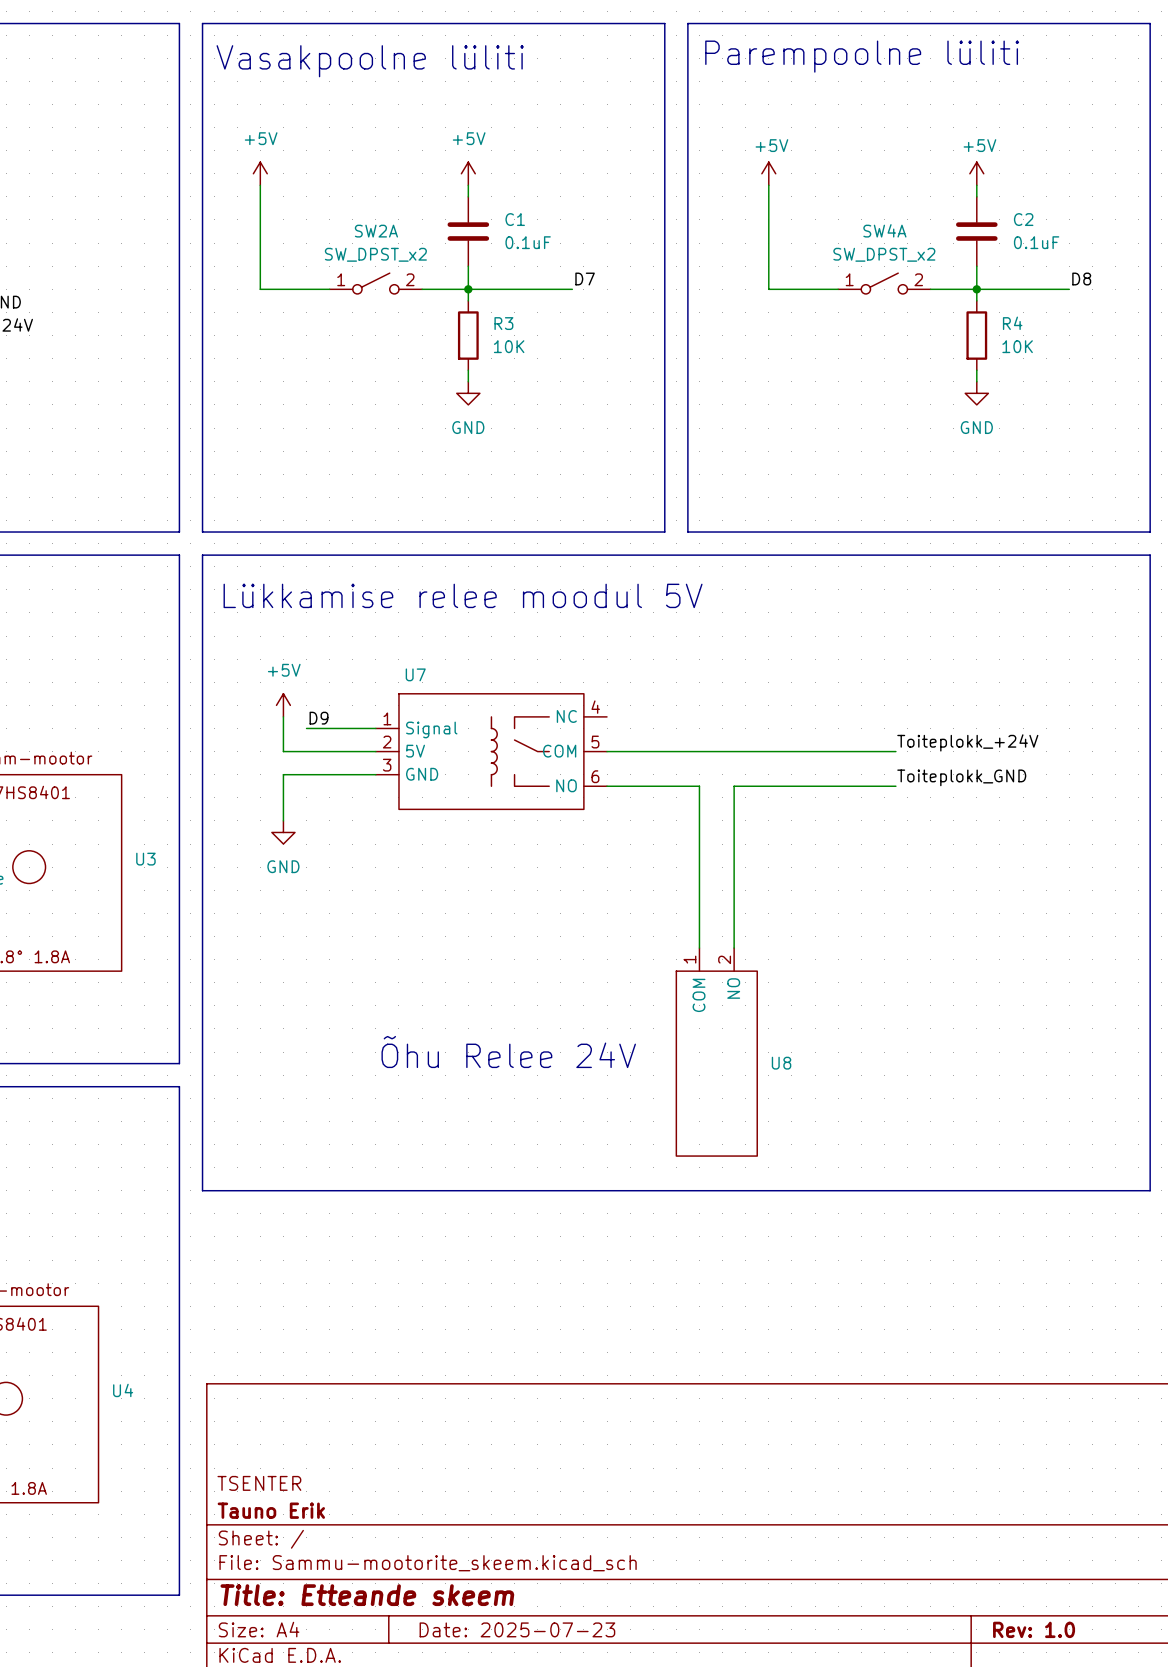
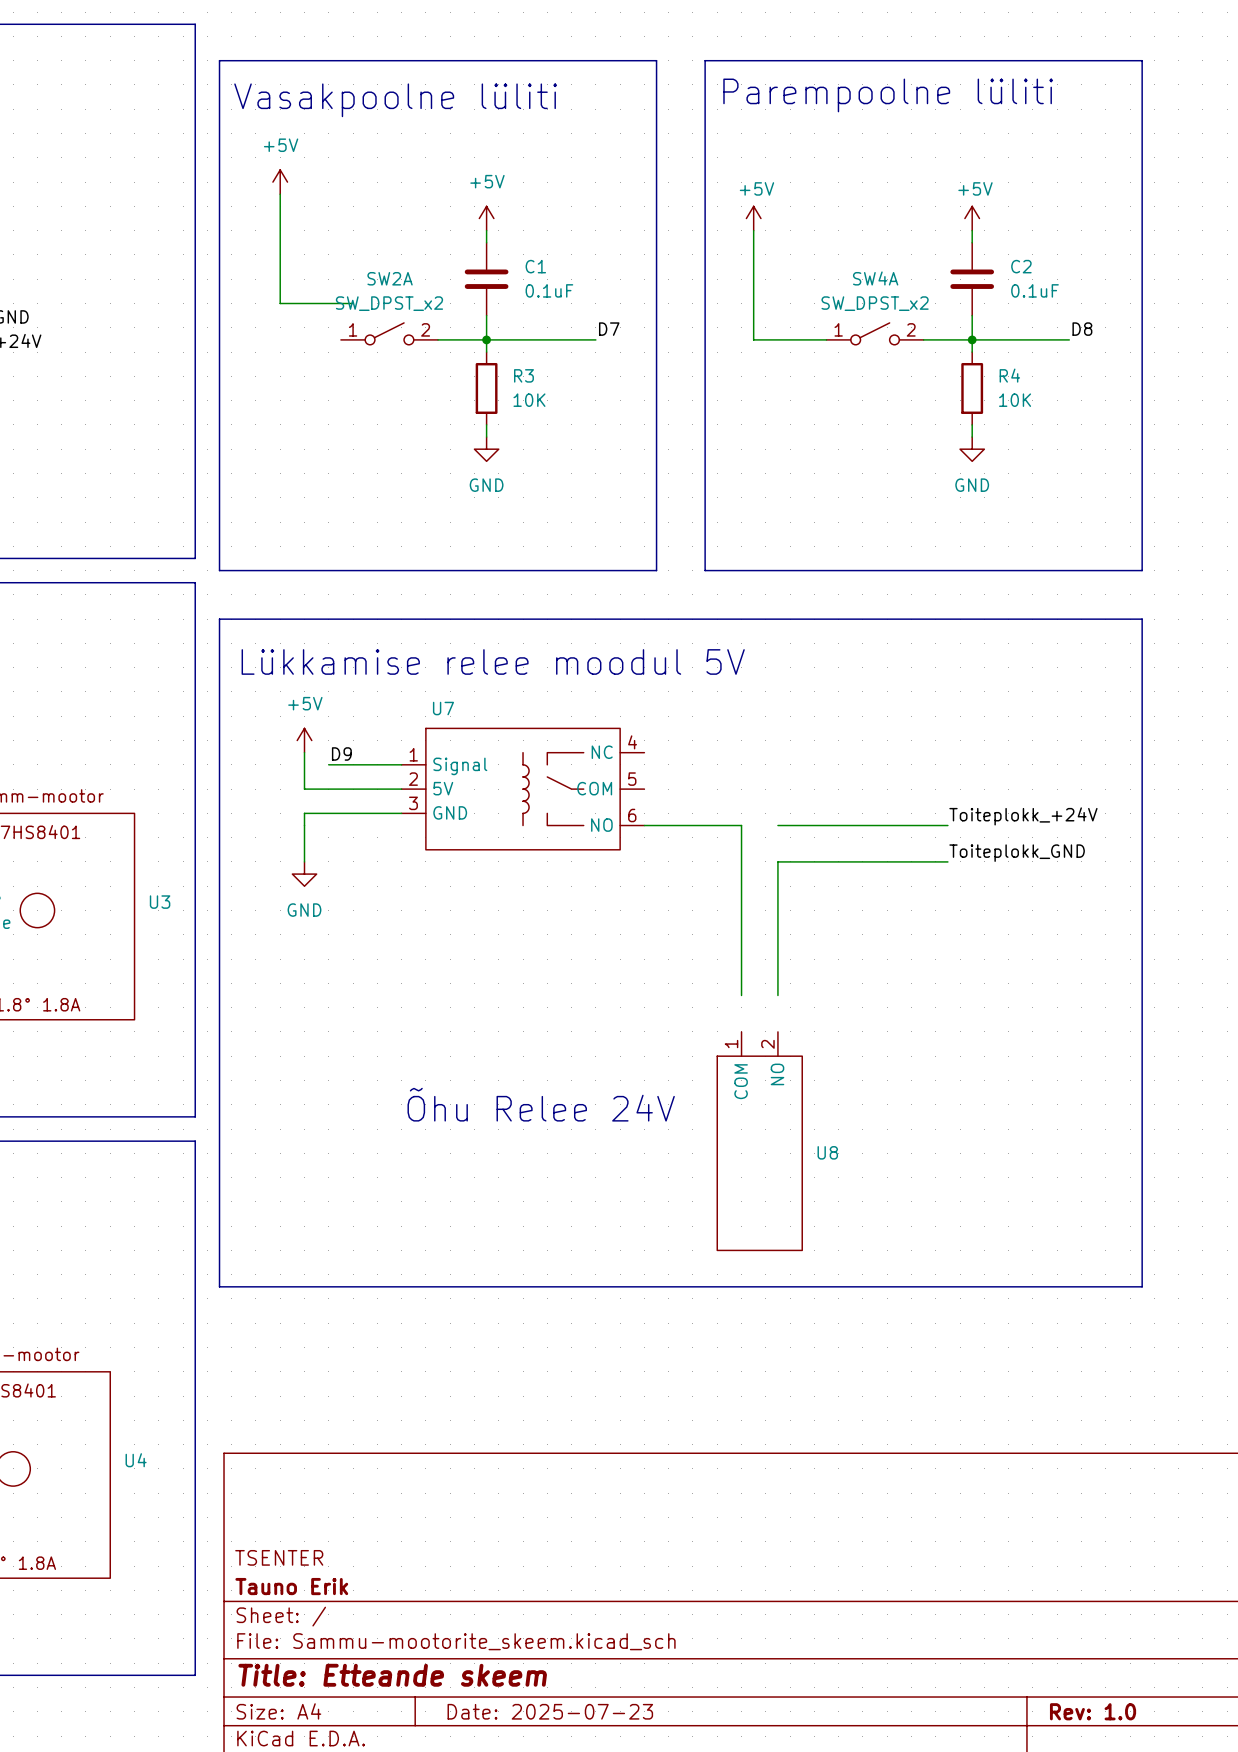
line: (687, 23) (1150, 23) (1150, 532) (687, 532) (687, 23) -> none
text position: Parempoolne lüliti (862, 56) -> Parempoolne lüliti (888, 95)
line: (202, 58) (202, 23) (664, 23) (664, 58) -> (219, 60) (656, 60) (656, 570) (219, 570) (219, 558)
text position: Vasakpoolne lüliti (370, 61) -> Vasakpoolne lüliti (395, 100)
power symbol position: +5V (468, 173) -> +5V (486, 218)
power symbol position: +5V (768, 173) -> +5V (753, 218)
power symbol position: +5V (976, 173) -> +5V (972, 218)
wire: (468, 185) (468, 196) -> (486, 230) (486, 242)
wire: (768, 185) (768, 289) (838, 289) -> (753, 230) (753, 339) (826, 339)
wire: (976, 185) (976, 196) -> (972, 230) (972, 242)
C1 position: (468, 231) -> (486, 279)
C2 position: (976, 231) -> (972, 279)
wire: (468, 266) (468, 300) -> (486, 315) (486, 352)
wire: (976, 266) (976, 300) -> (972, 315) (972, 352)
label position: D7 (585, 279) -> D7 (609, 329)
label position: D8 (1081, 279) -> D8 (1082, 329)
SW2A position: (375, 283) -> (389, 333)
SW4A position: (884, 283) -> (875, 333)
wire: (422, 289) (572, 289) -> (438, 339) (595, 339)
junction position: (468, 289) -> (486, 339)
wire: (930, 289) (1069, 289) -> (923, 339) (1069, 339)
junction: (976, 289) -> none
junction: none -> (972, 339)
R3 position: (468, 335) -> (486, 388)
R4 position: (976, 335) -> (972, 388)
wire: (468, 370) (468, 381) -> (486, 424) (486, 437)
wire: (976, 370) (976, 381) -> (972, 424) (972, 437)
power symbol position: GND (468, 393) -> GND (486, 449)
power symbol position: GND (976, 393) -> GND (972, 449)
line: (202, 532) (664, 532) -> (705, 60) (1142, 60) (1142, 570) (705, 570) (705, 558)
line: (202, 589) (202, 555) (1150, 555) (1150, 1190) (202, 1190) -> (219, 619) (1142, 619) (1142, 1286) (219, 1286) (219, 1250)
text position: Lükkamise relee moodul 5V (463, 595) -> Lükkamise relee moodul 5V (493, 661)
label: Toiteplokk_+24V (967, 742) -> none
wire: (607, 751) (895, 751) -> none
label: Toiteplokk_GND (961, 777) -> Toiteplokk_+24V (1023, 816)
wire: (734, 786) (734, 820) -> (947, 861) (777, 861)
label: none -> Toiteplokk_GND (1017, 853)
U8 position: (716, 1052) -> (759, 1141)

